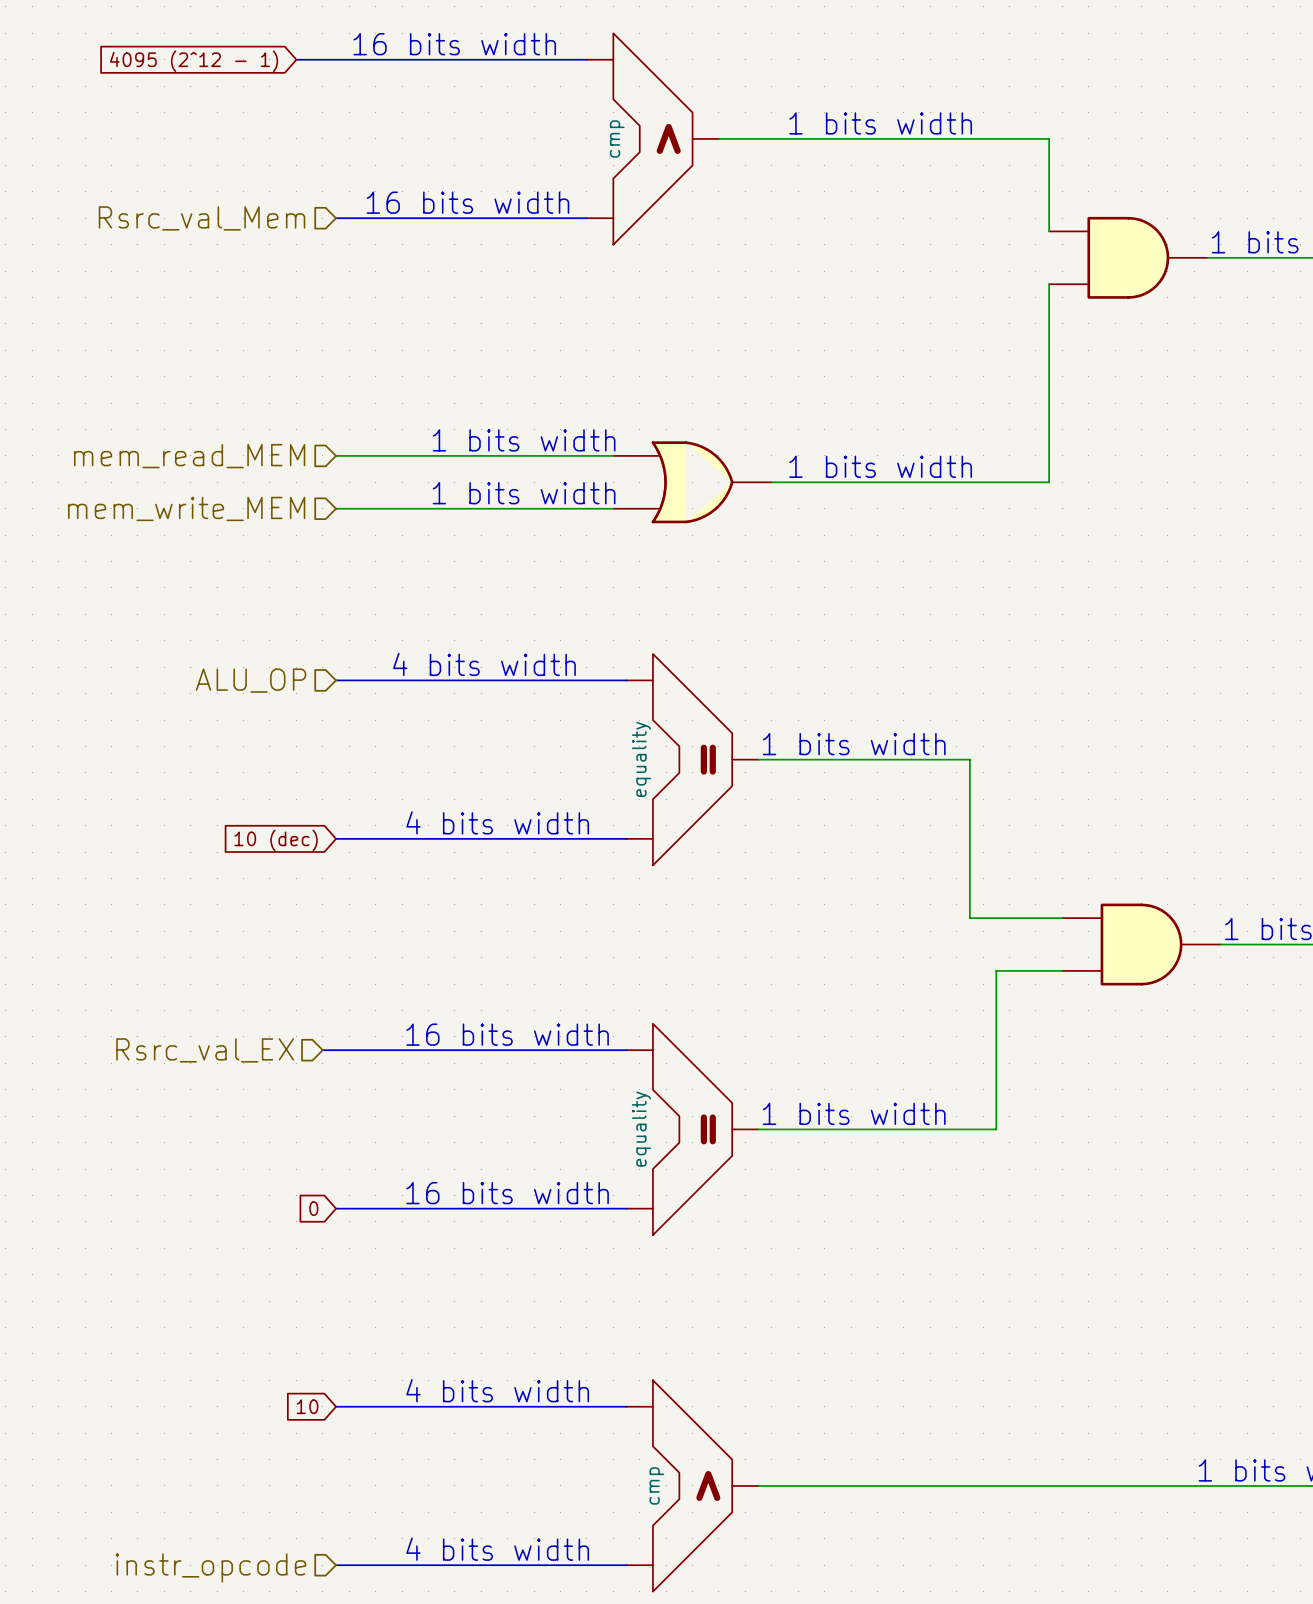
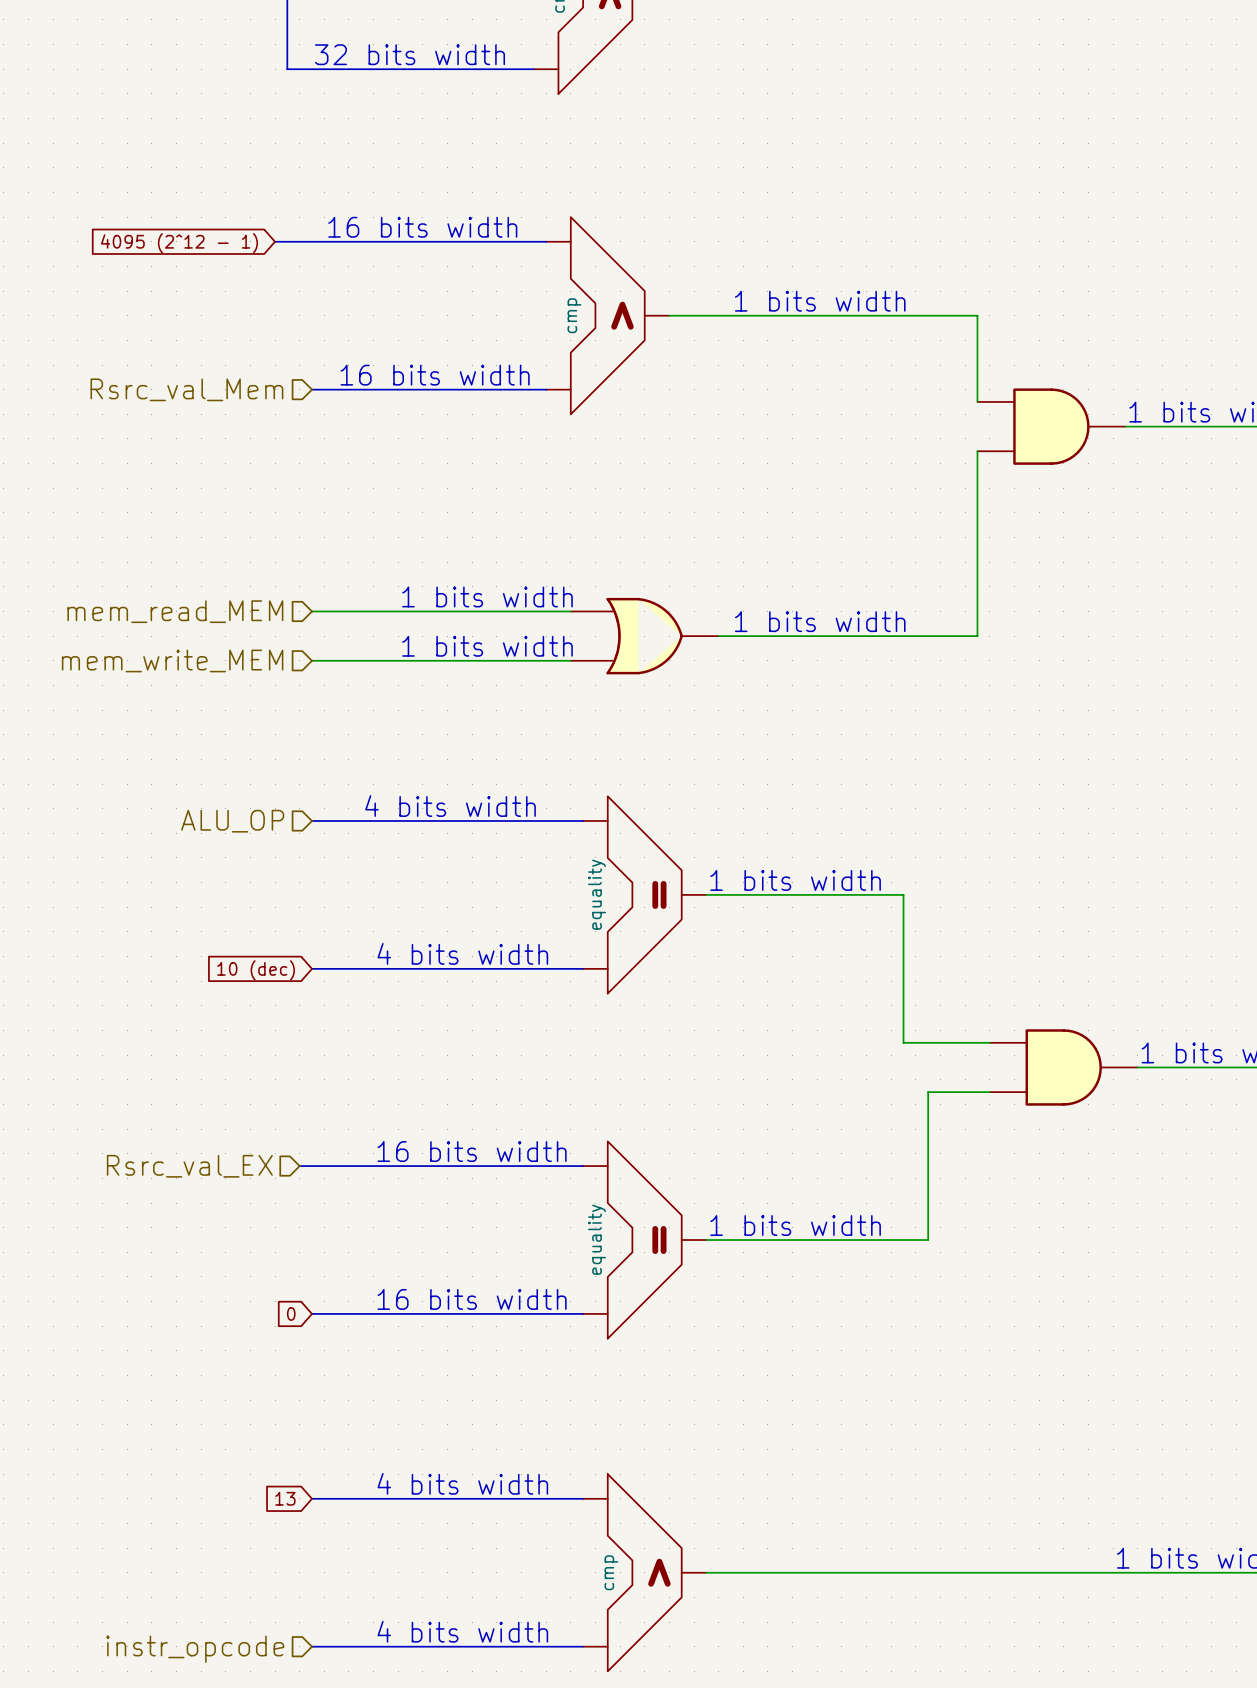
global label: 10 (307, 1406) -> 13 (285, 1498)

